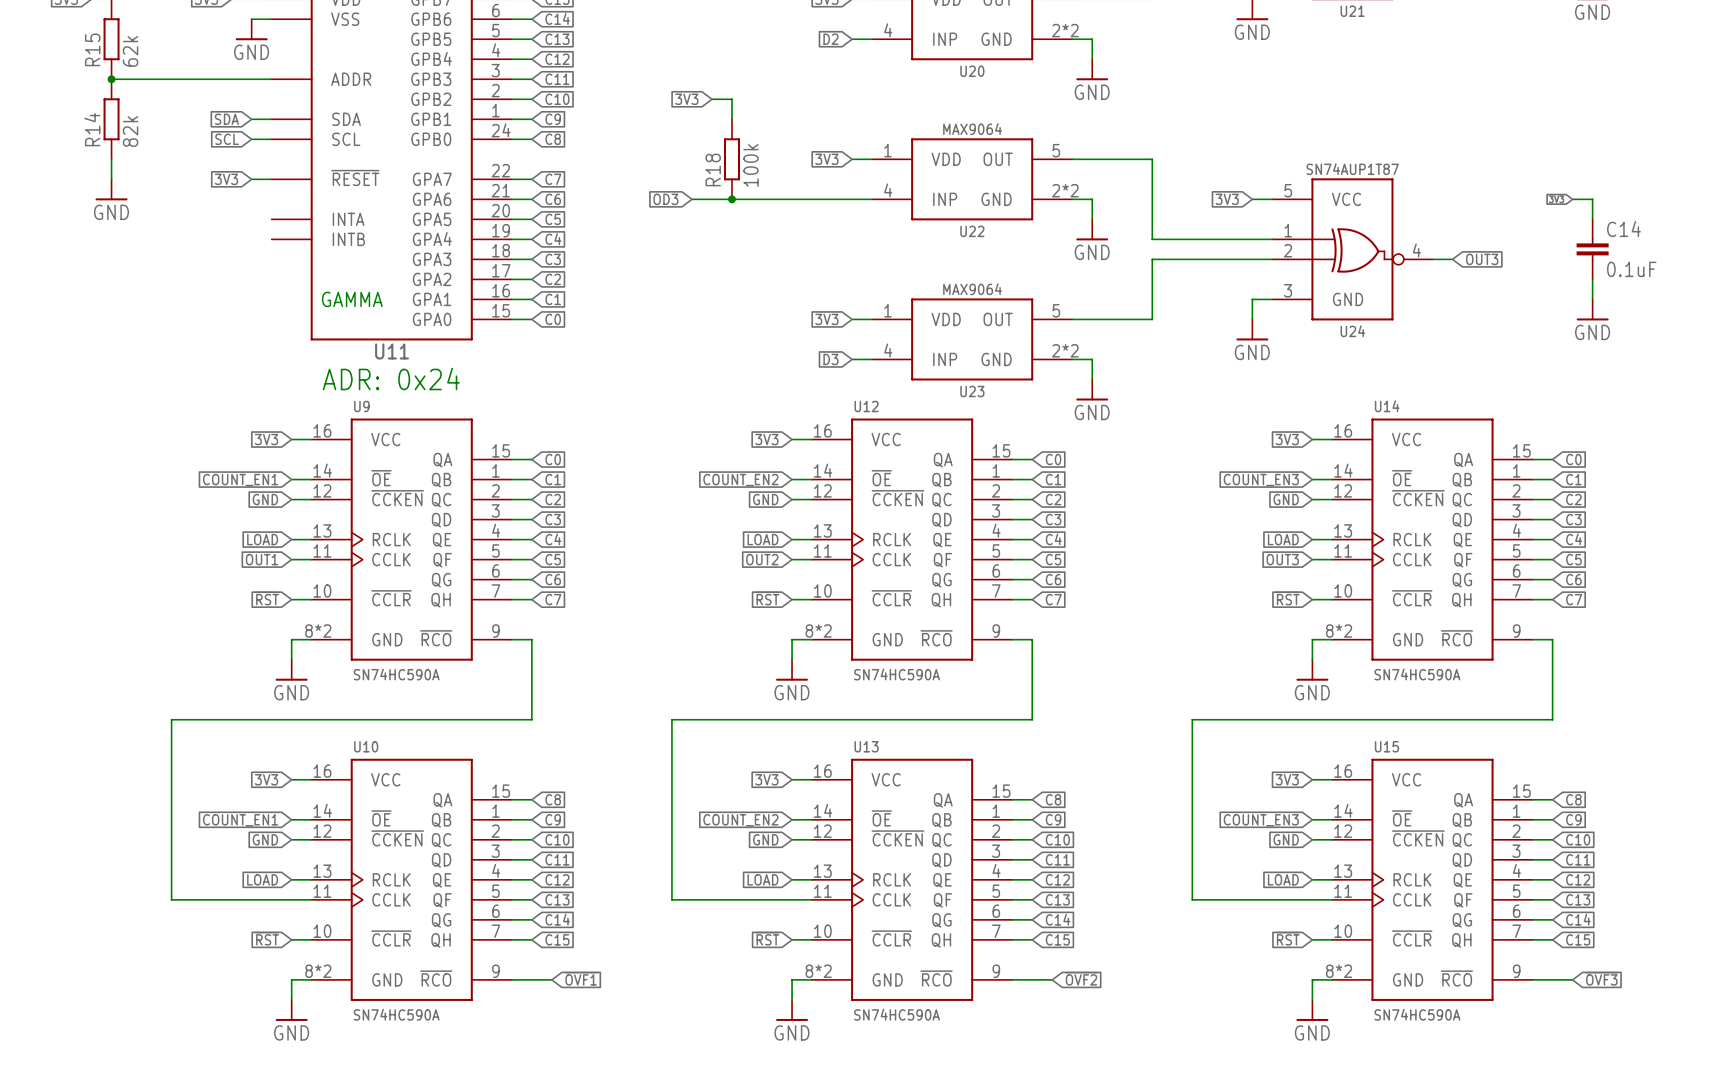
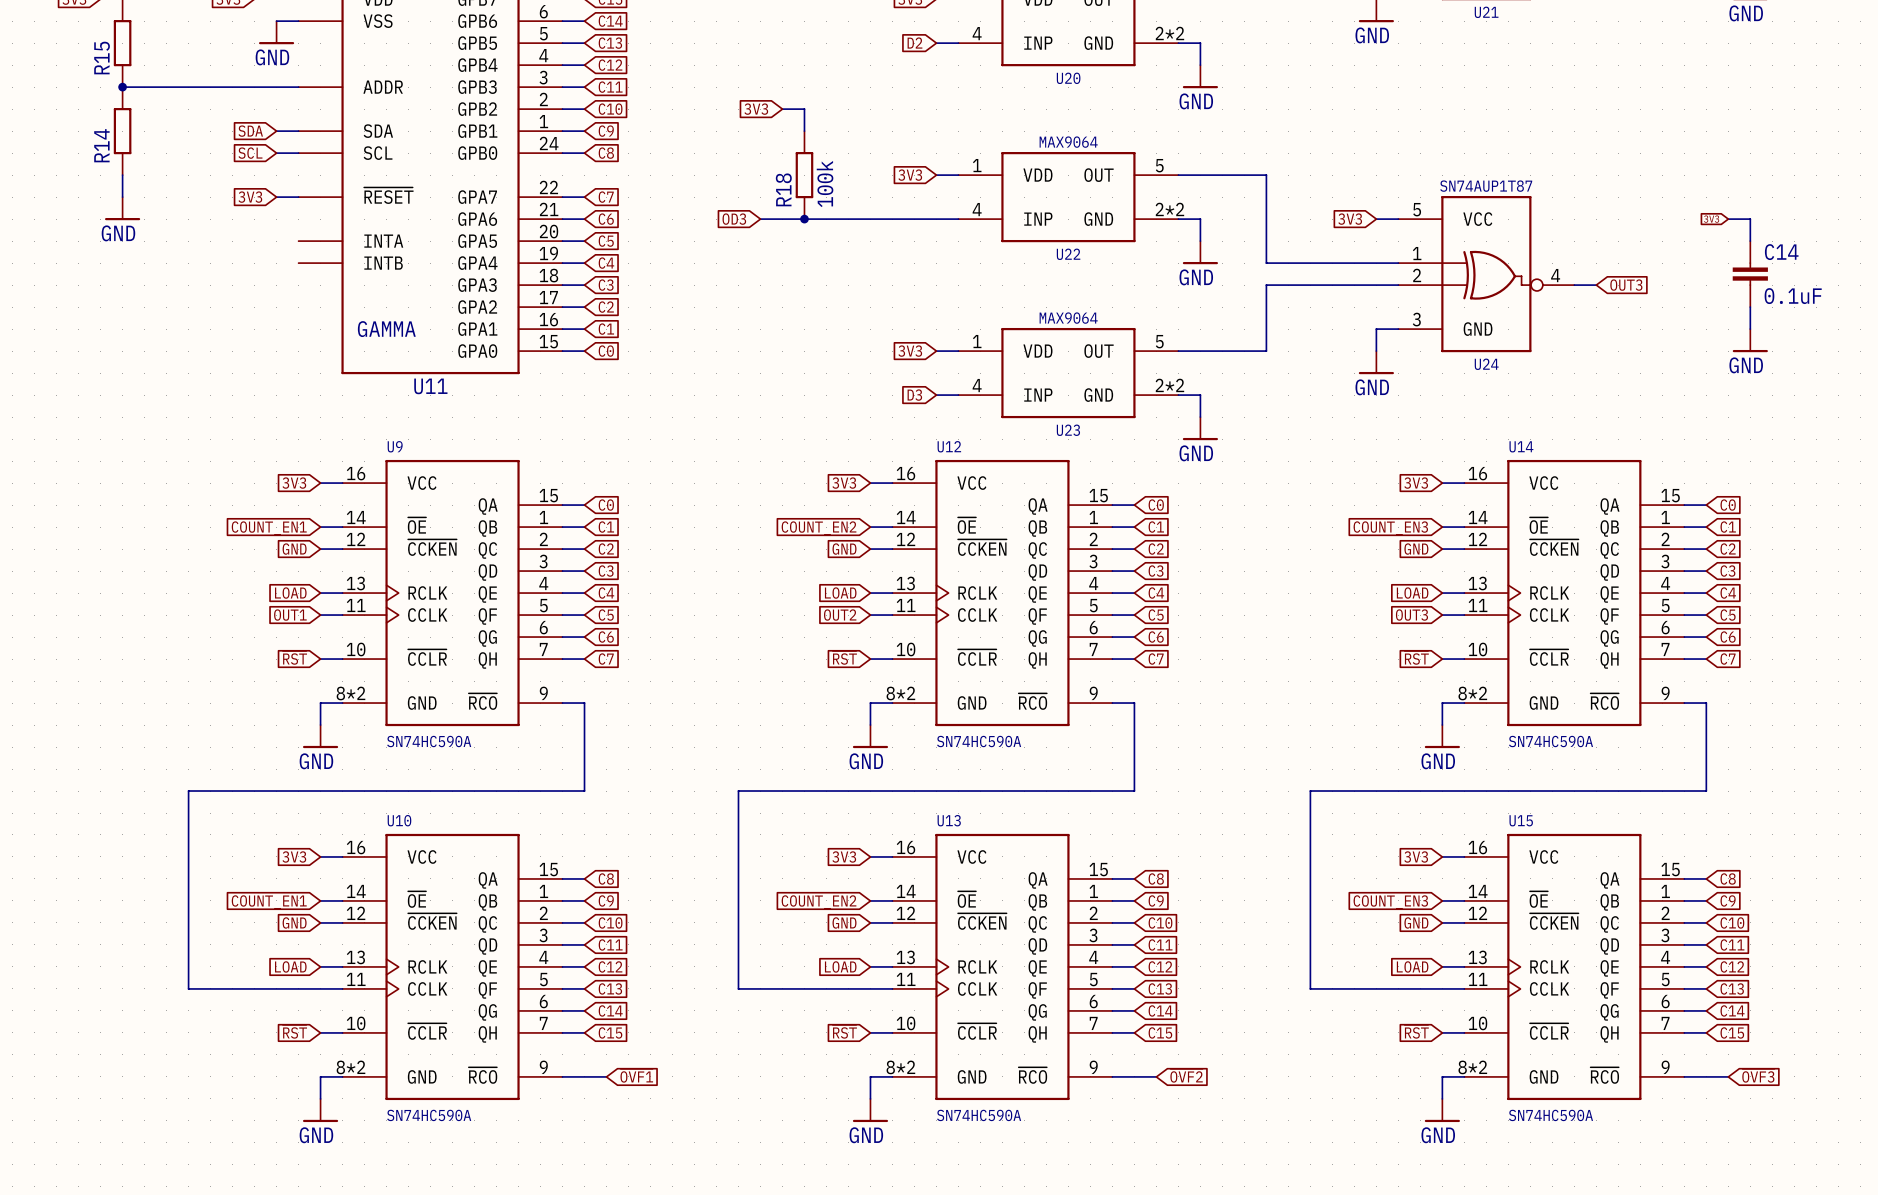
R15 value: 62k (130, 51) -> none
R14 value: 82k (130, 131) -> none
text: ADR: 0x24 (391, 379) -> none

